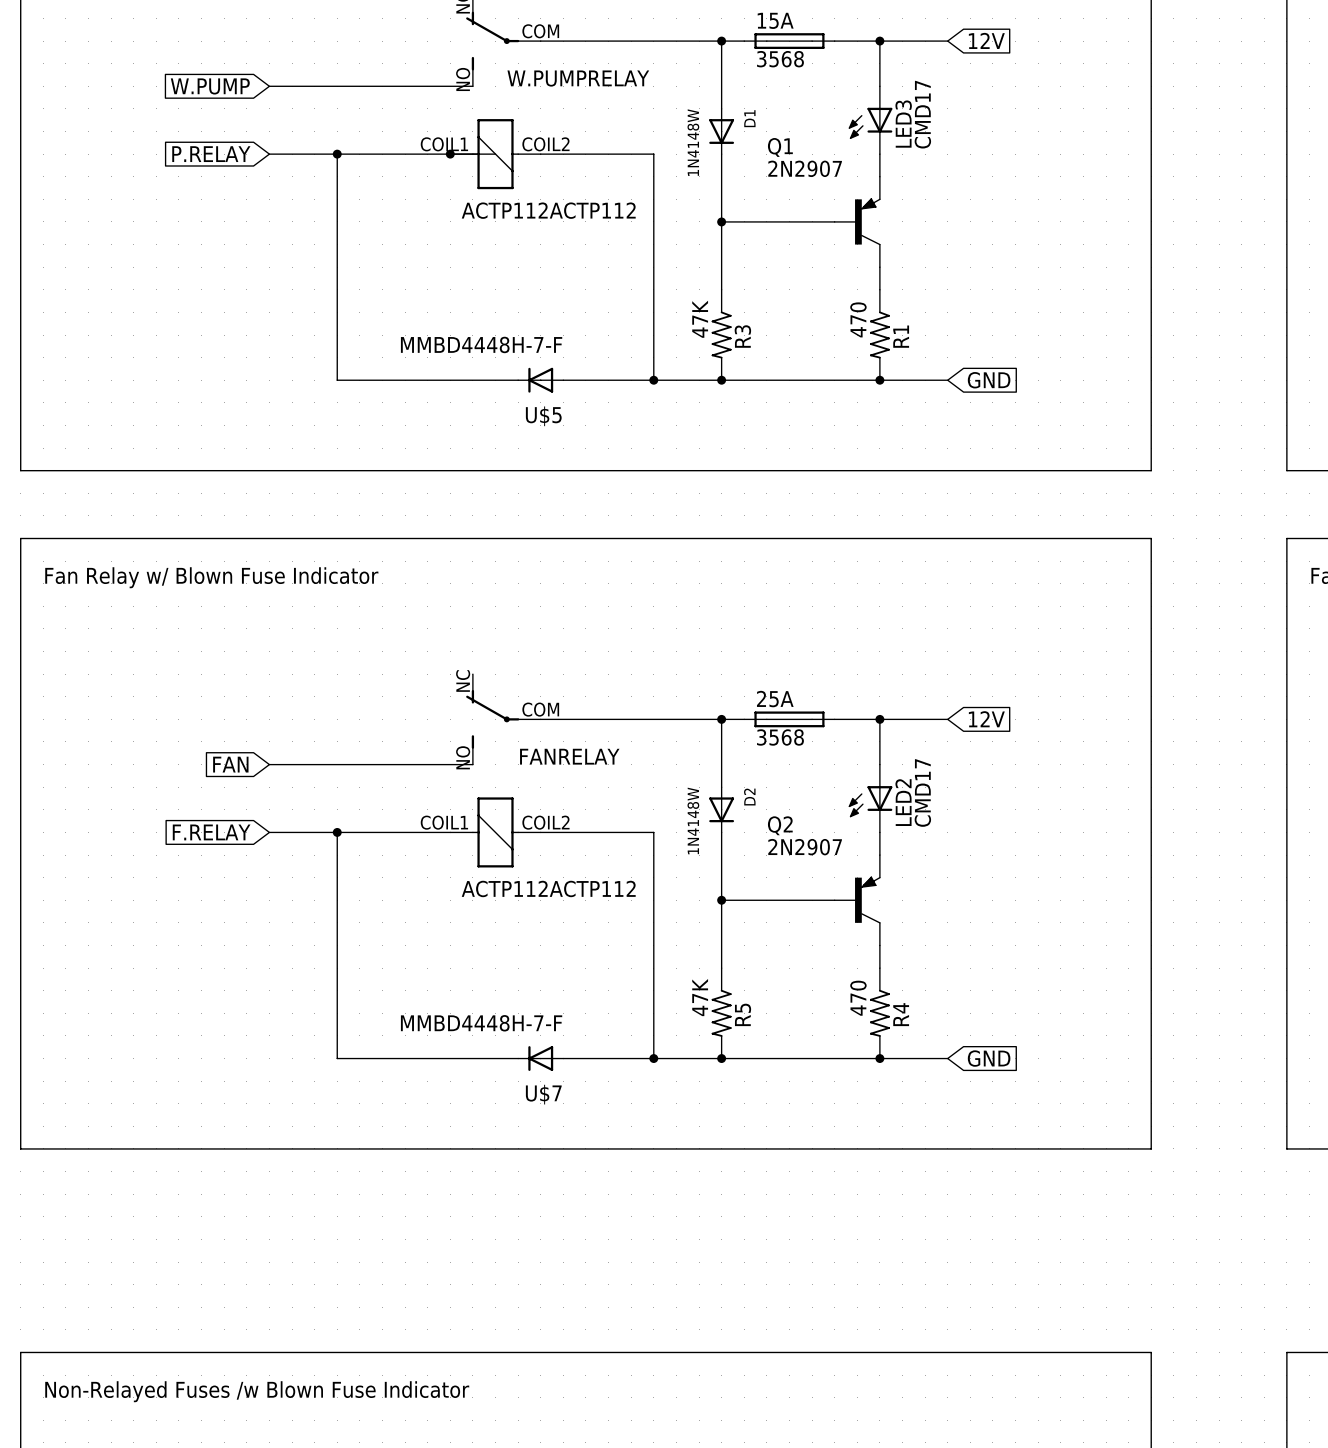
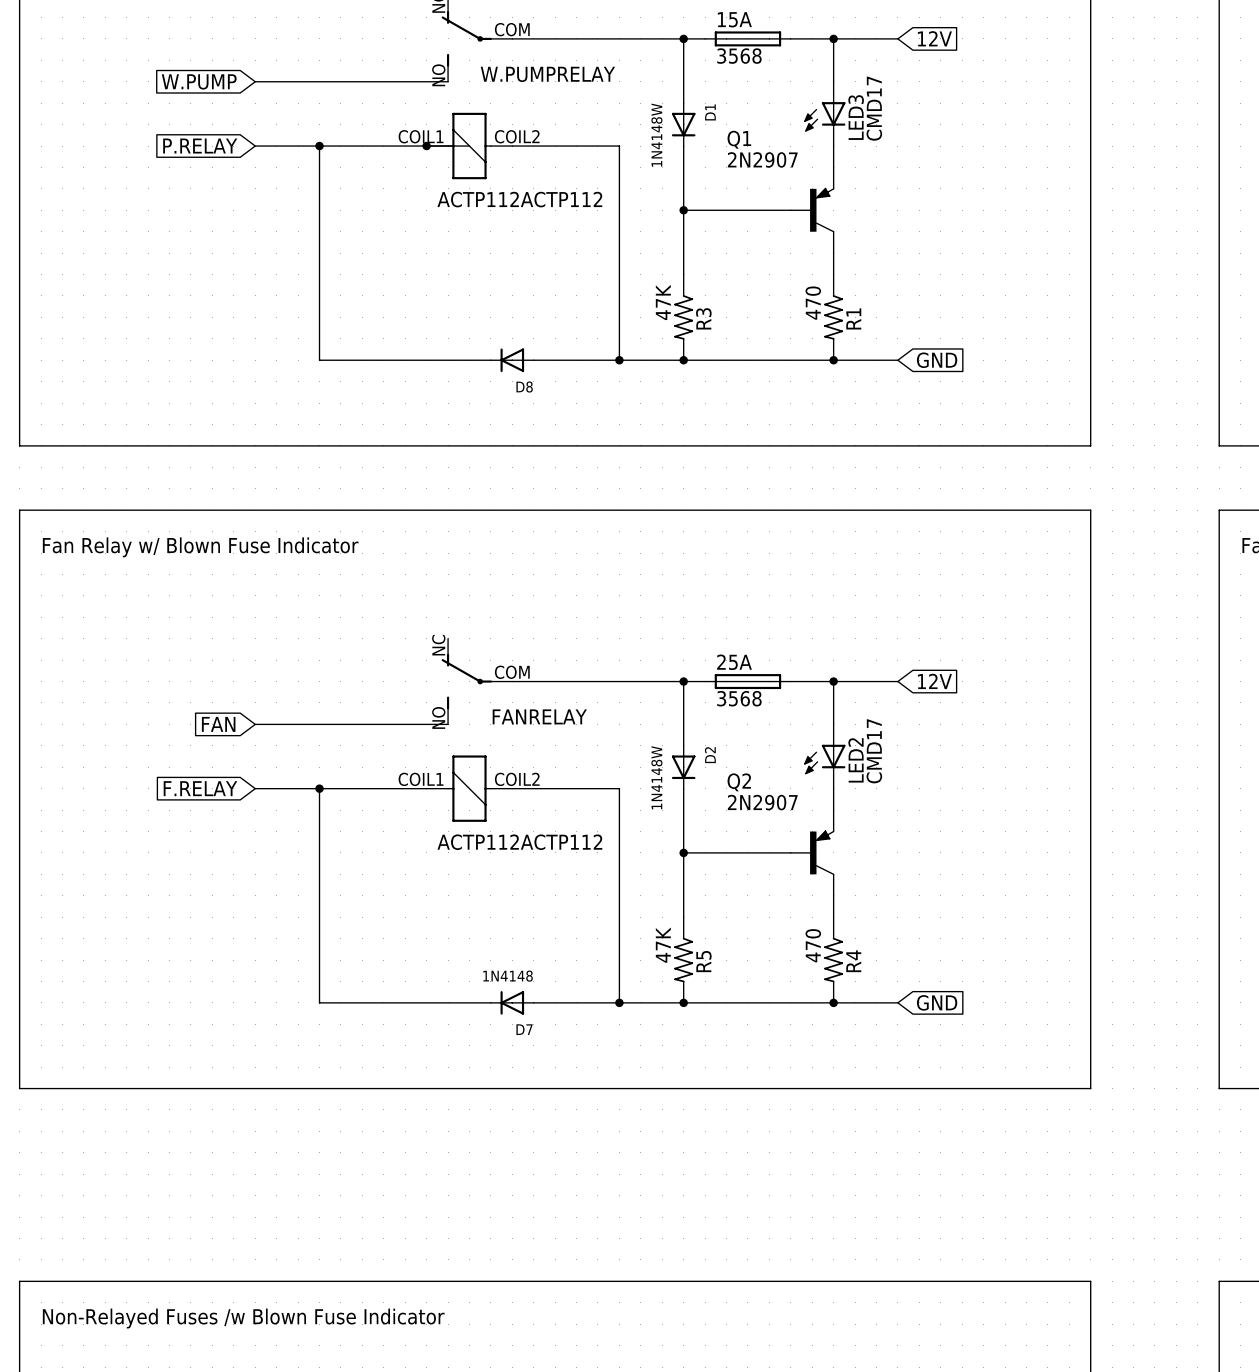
U$5 value: MMBD4448H-7-F (481, 344) -> none
U$5 name: U$5 (543, 416) -> D8 (524, 387)
U$7 value: MMBD4448H-7-F (481, 1023) -> 1N4148 (508, 976)
U$7 name: U$7 (543, 1094) -> D7 (524, 1029)

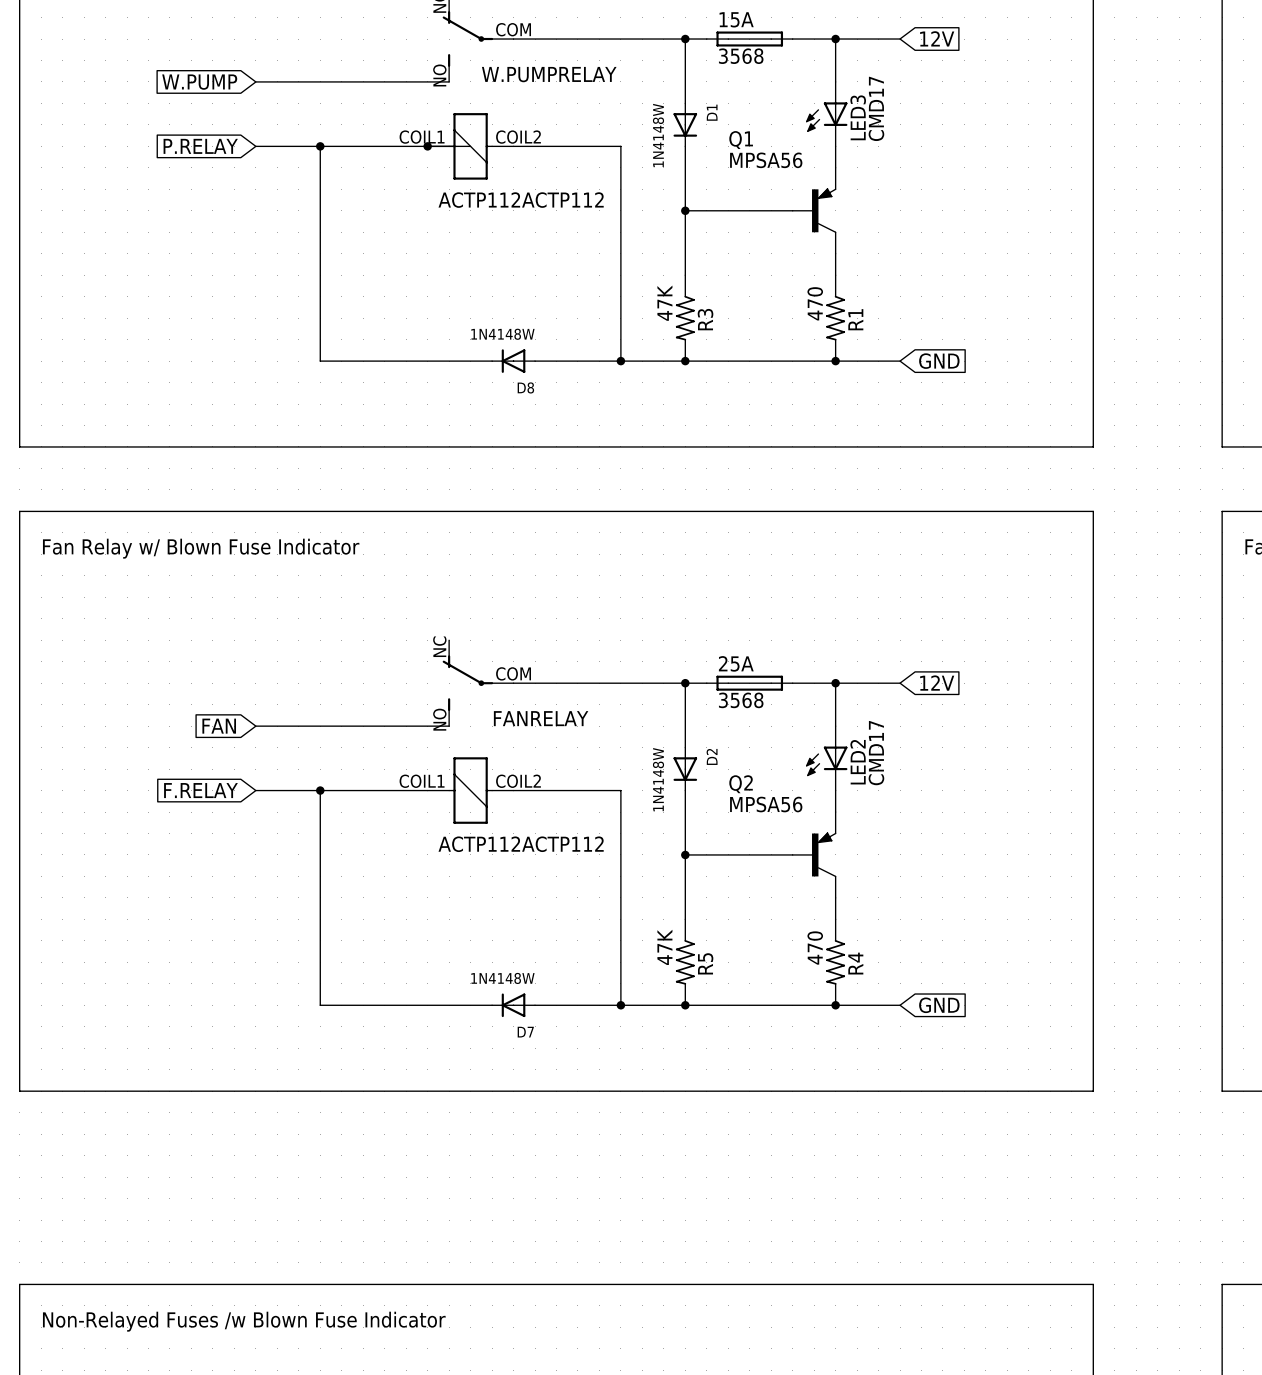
Q1 value: 2N2907 (762, 159) -> MPSA56 (766, 160)
D8 value: none -> 1N4148W (502, 334)
Q2 value: 2N2907 (762, 802) -> MPSA56 (766, 804)
D7 value: 1N4148 (508, 976) -> 1N4148W (502, 978)

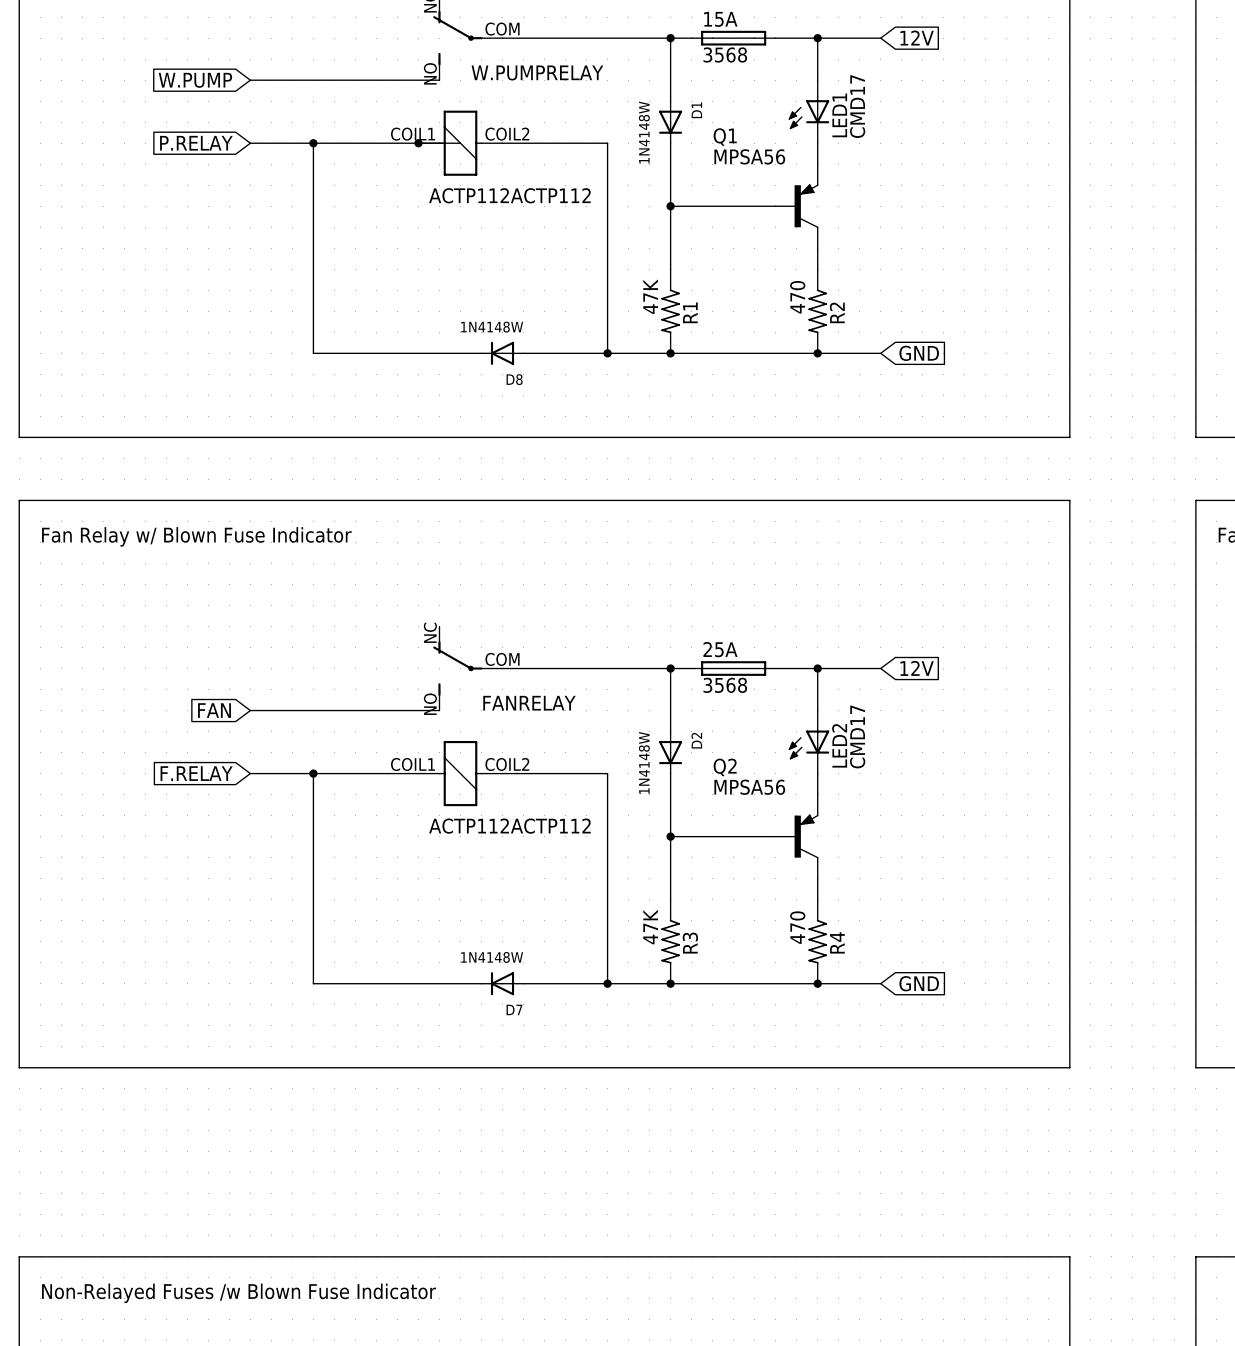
LED3 name: LED3 (858, 117) -> LED1 (839, 115)
R3 name: R3 (705, 319) -> R1 (690, 312)
R1 name: R1 (855, 319) -> R2 (837, 312)
R5 name: R5 (705, 963) -> R3 (690, 943)

